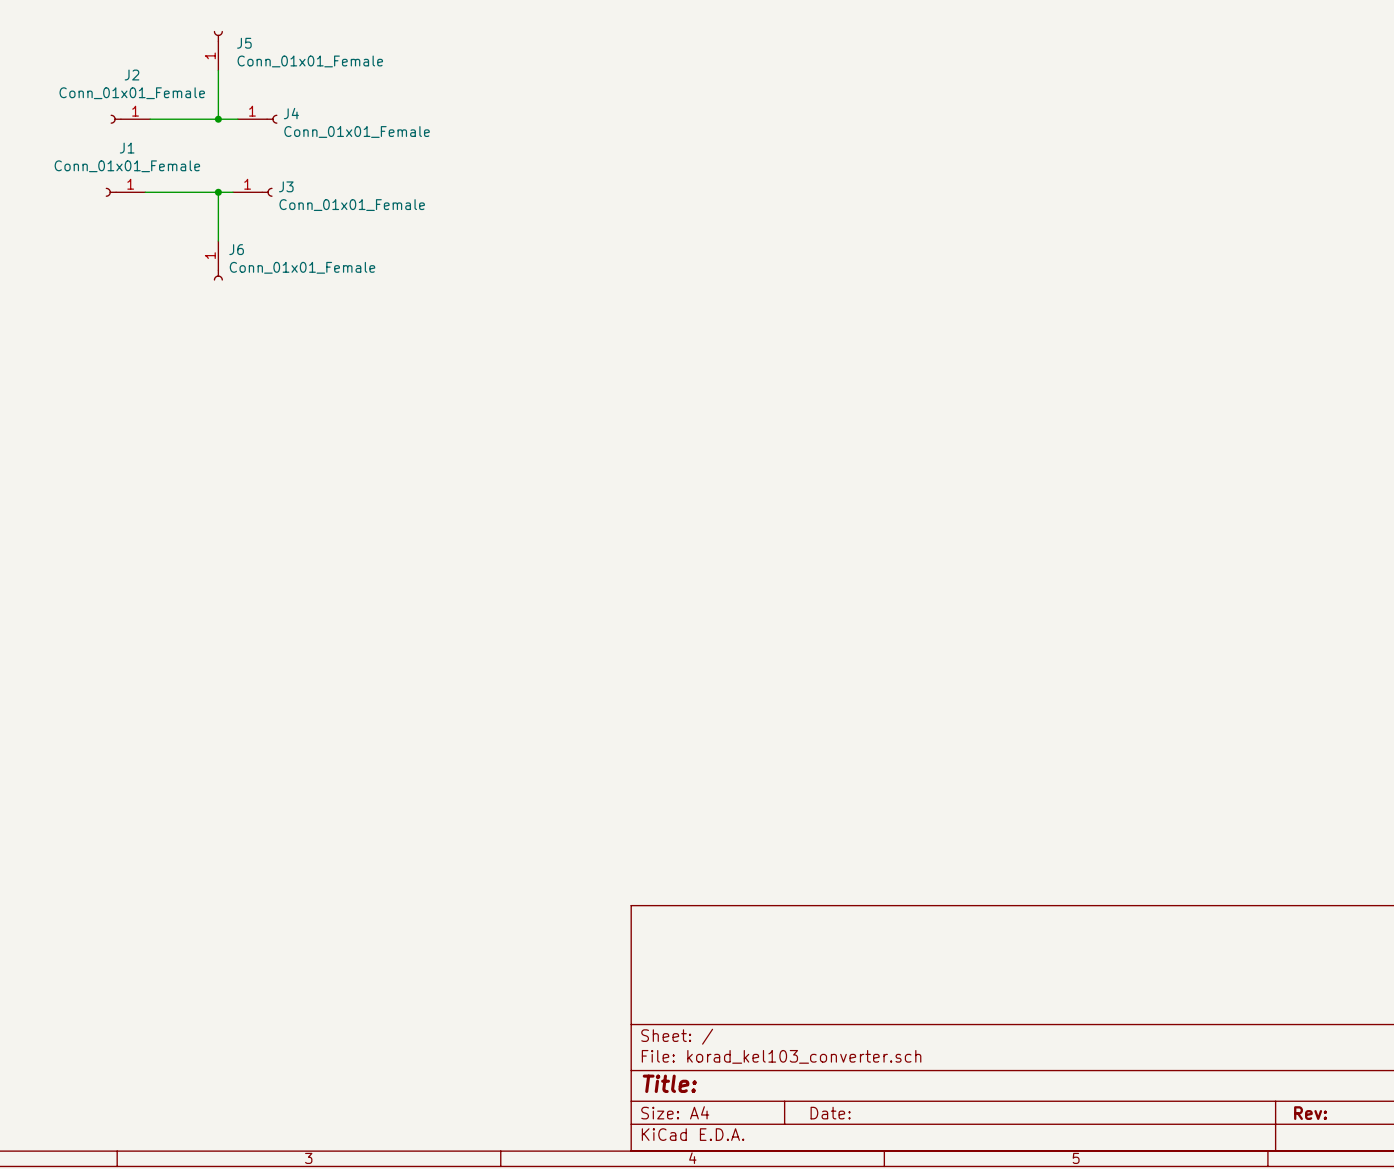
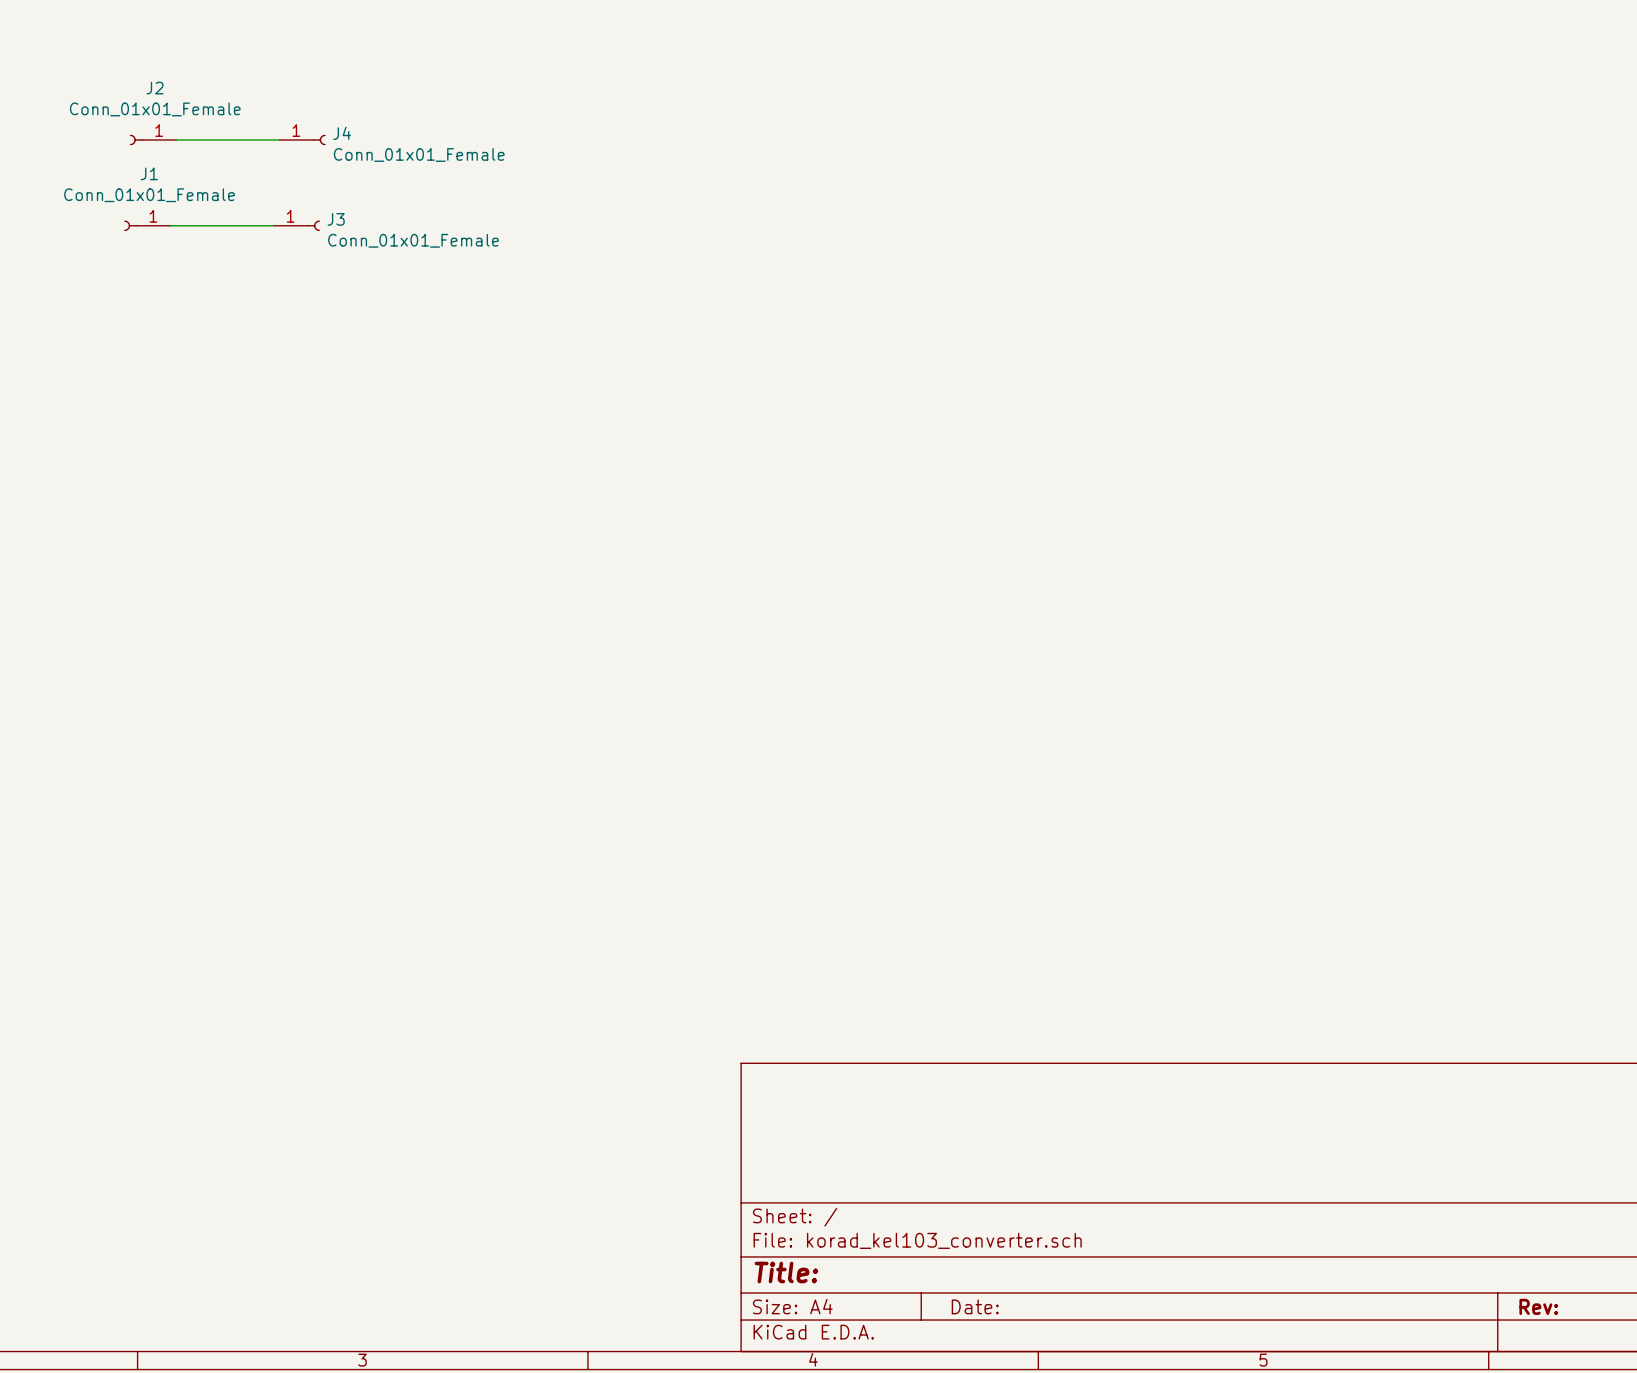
J5: Conn_01x01_Female (218, 50) -> none
wire: (218, 70) (218, 119) -> none
junction: (218, 119) -> none
wire: (218, 192) (218, 241) -> none
junction: (218, 192) -> none
J6: Conn_01x01_Female (218, 260) -> none

